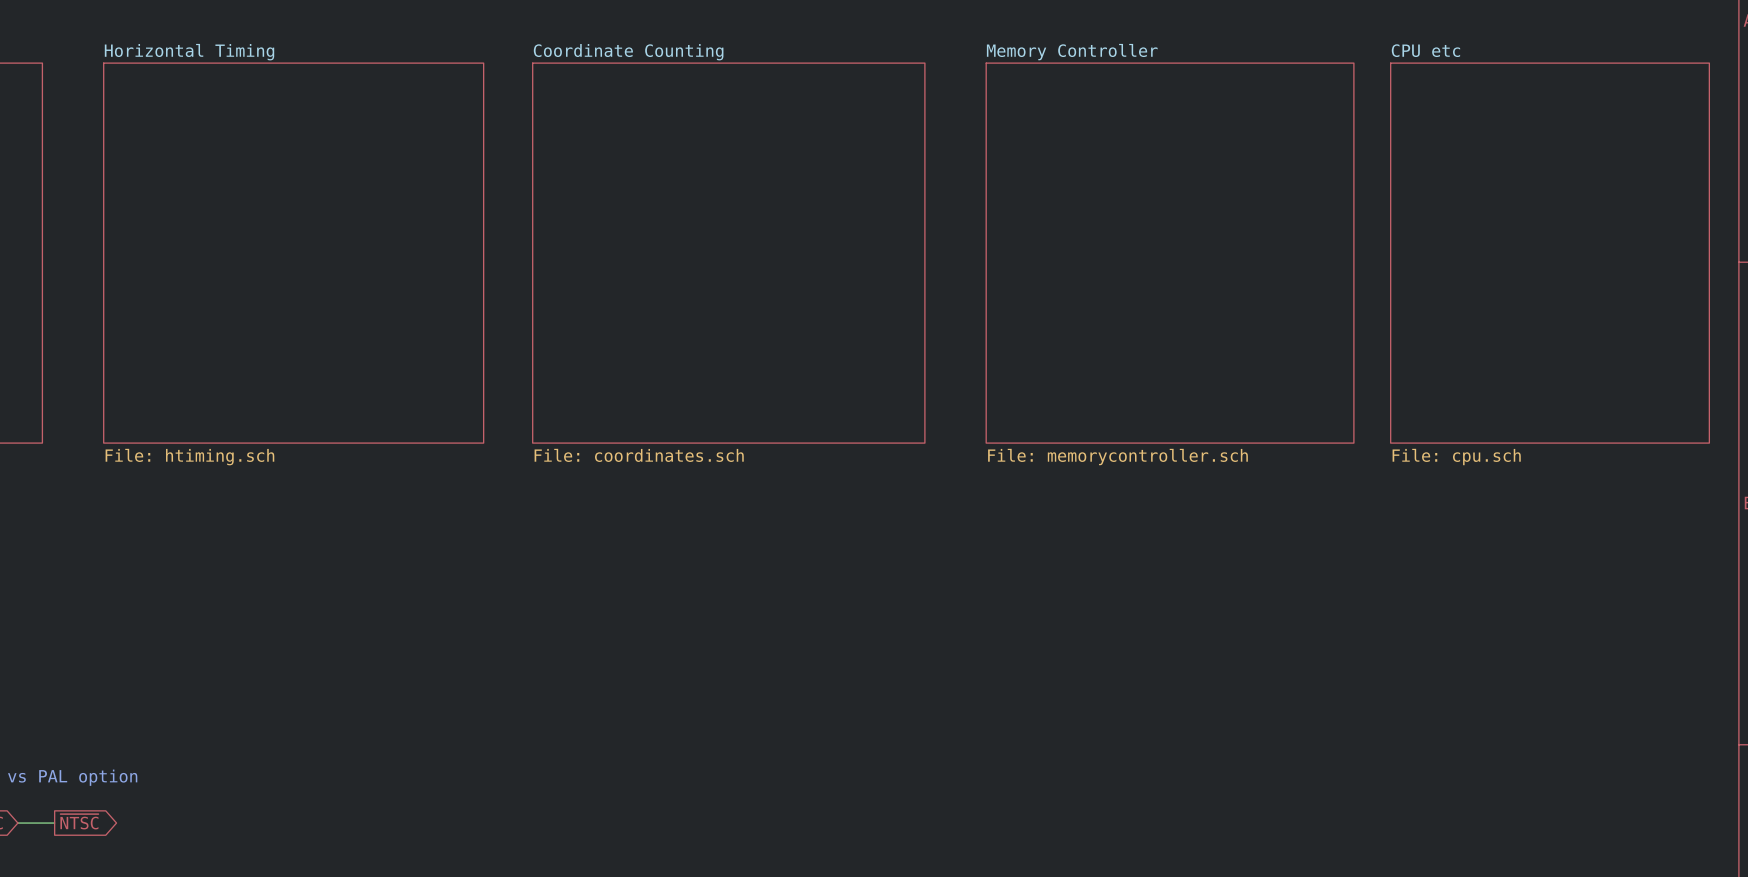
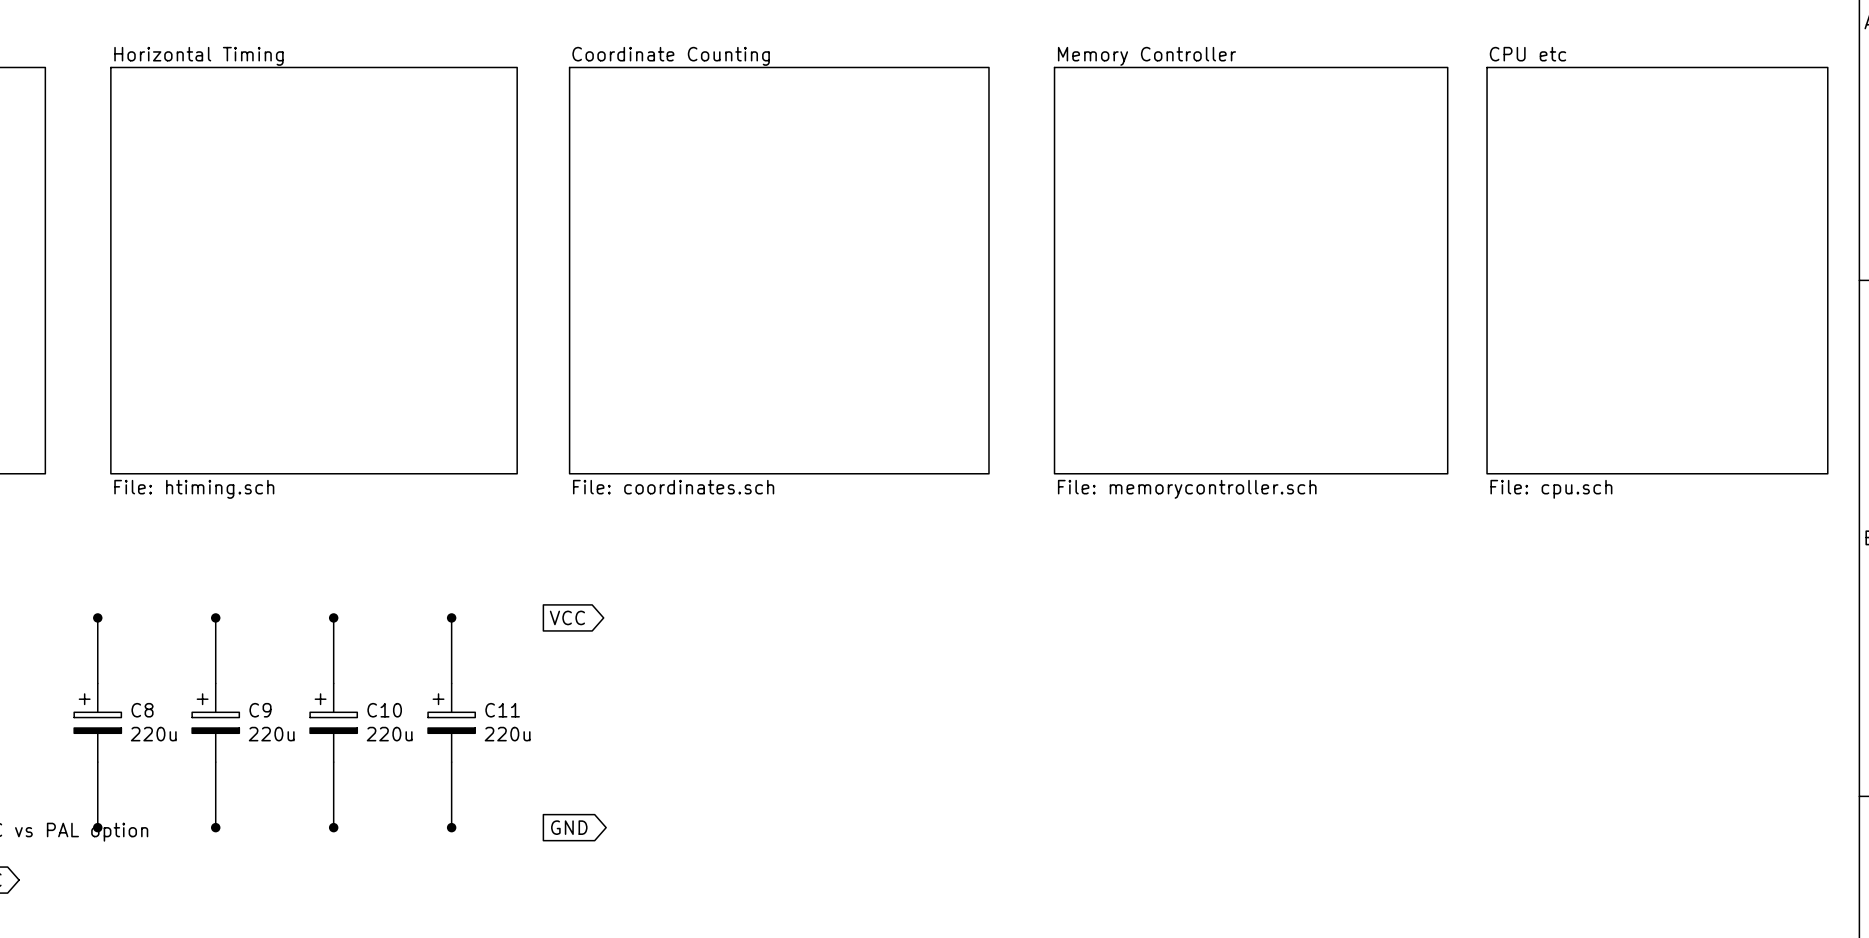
wire: none -> (97, 617) (97, 683)
junction: none -> (97, 617)
wire: none -> (215, 617) (215, 683)
junction: none -> (215, 617)
wire: none -> (333, 617) (333, 683)
junction: none -> (333, 617)
wire: none -> (451, 617) (451, 683)
junction: none -> (451, 617)
global label: none -> VCC (567, 617)
C8: none -> 220u (97, 722)
C9: none -> 220u (215, 722)
C10: none -> 220u (333, 722)
C11: none -> 220u (451, 722)
wire: none -> (97, 762) (97, 827)
wire: none -> (215, 762) (215, 827)
wire: none -> (333, 762) (333, 827)
wire: none -> (451, 762) (451, 827)
junction: none -> (97, 827)
junction: none -> (215, 827)
junction: none -> (333, 827)
junction: none -> (451, 827)
global label: none -> GND (569, 827)
global label: ~{NTSC} (79, 821) -> none
wire: (17, 823) (54, 823) -> none

